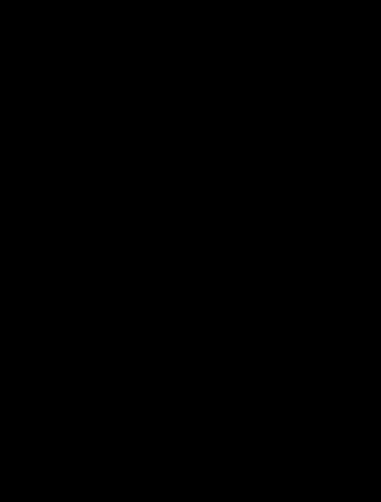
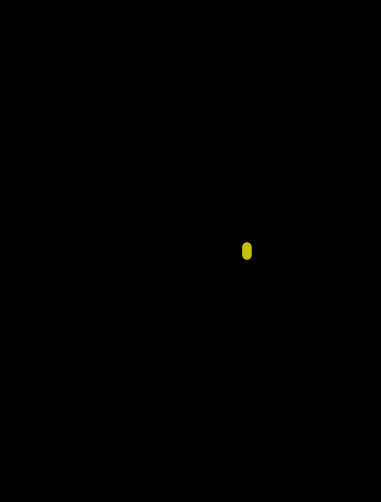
board edge: none -> (246, 246) (246, 255)

